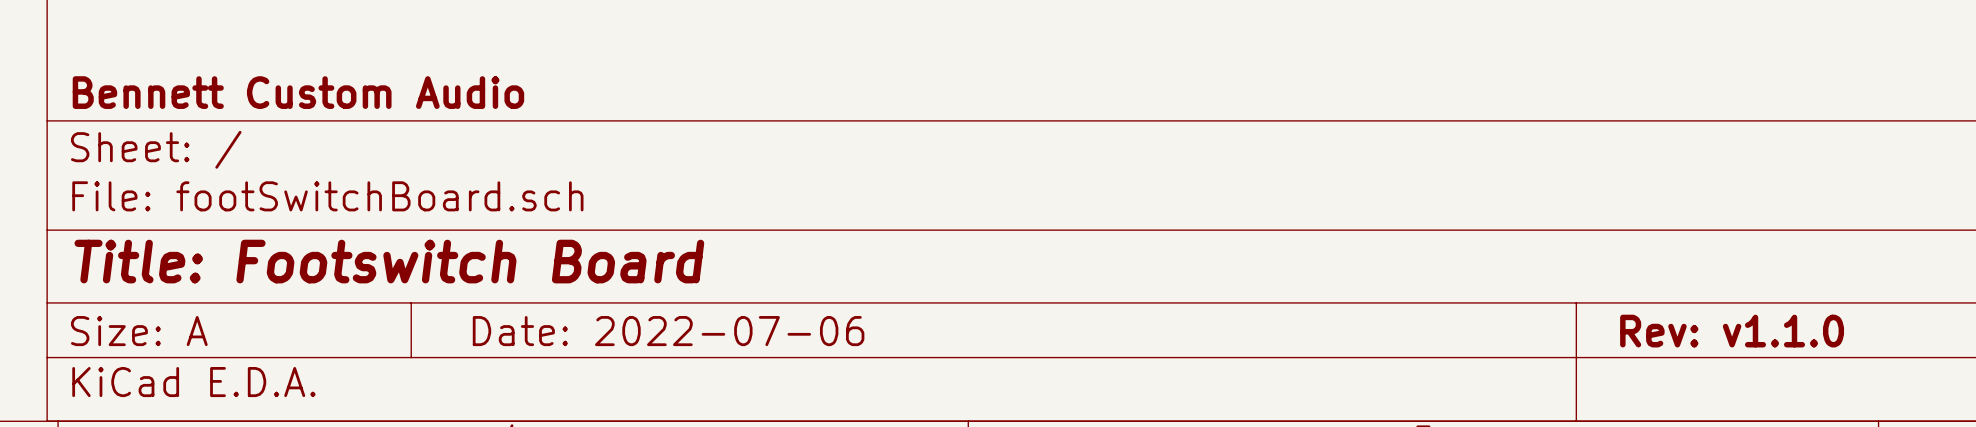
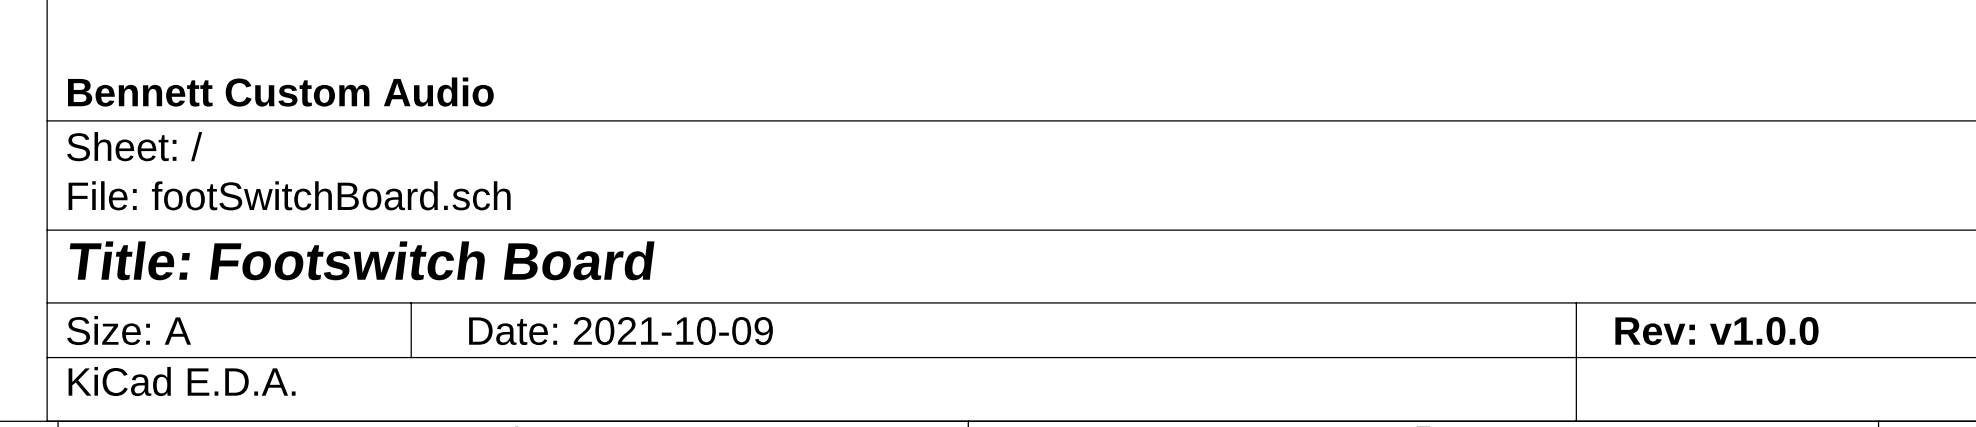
title block: Date: 2022-07-06 (668, 331) -> Date: 2021-10-09 (621, 331)
title block: Rev: v1.1.0 (1732, 331) -> Rev: v1.0.0 (1716, 331)

